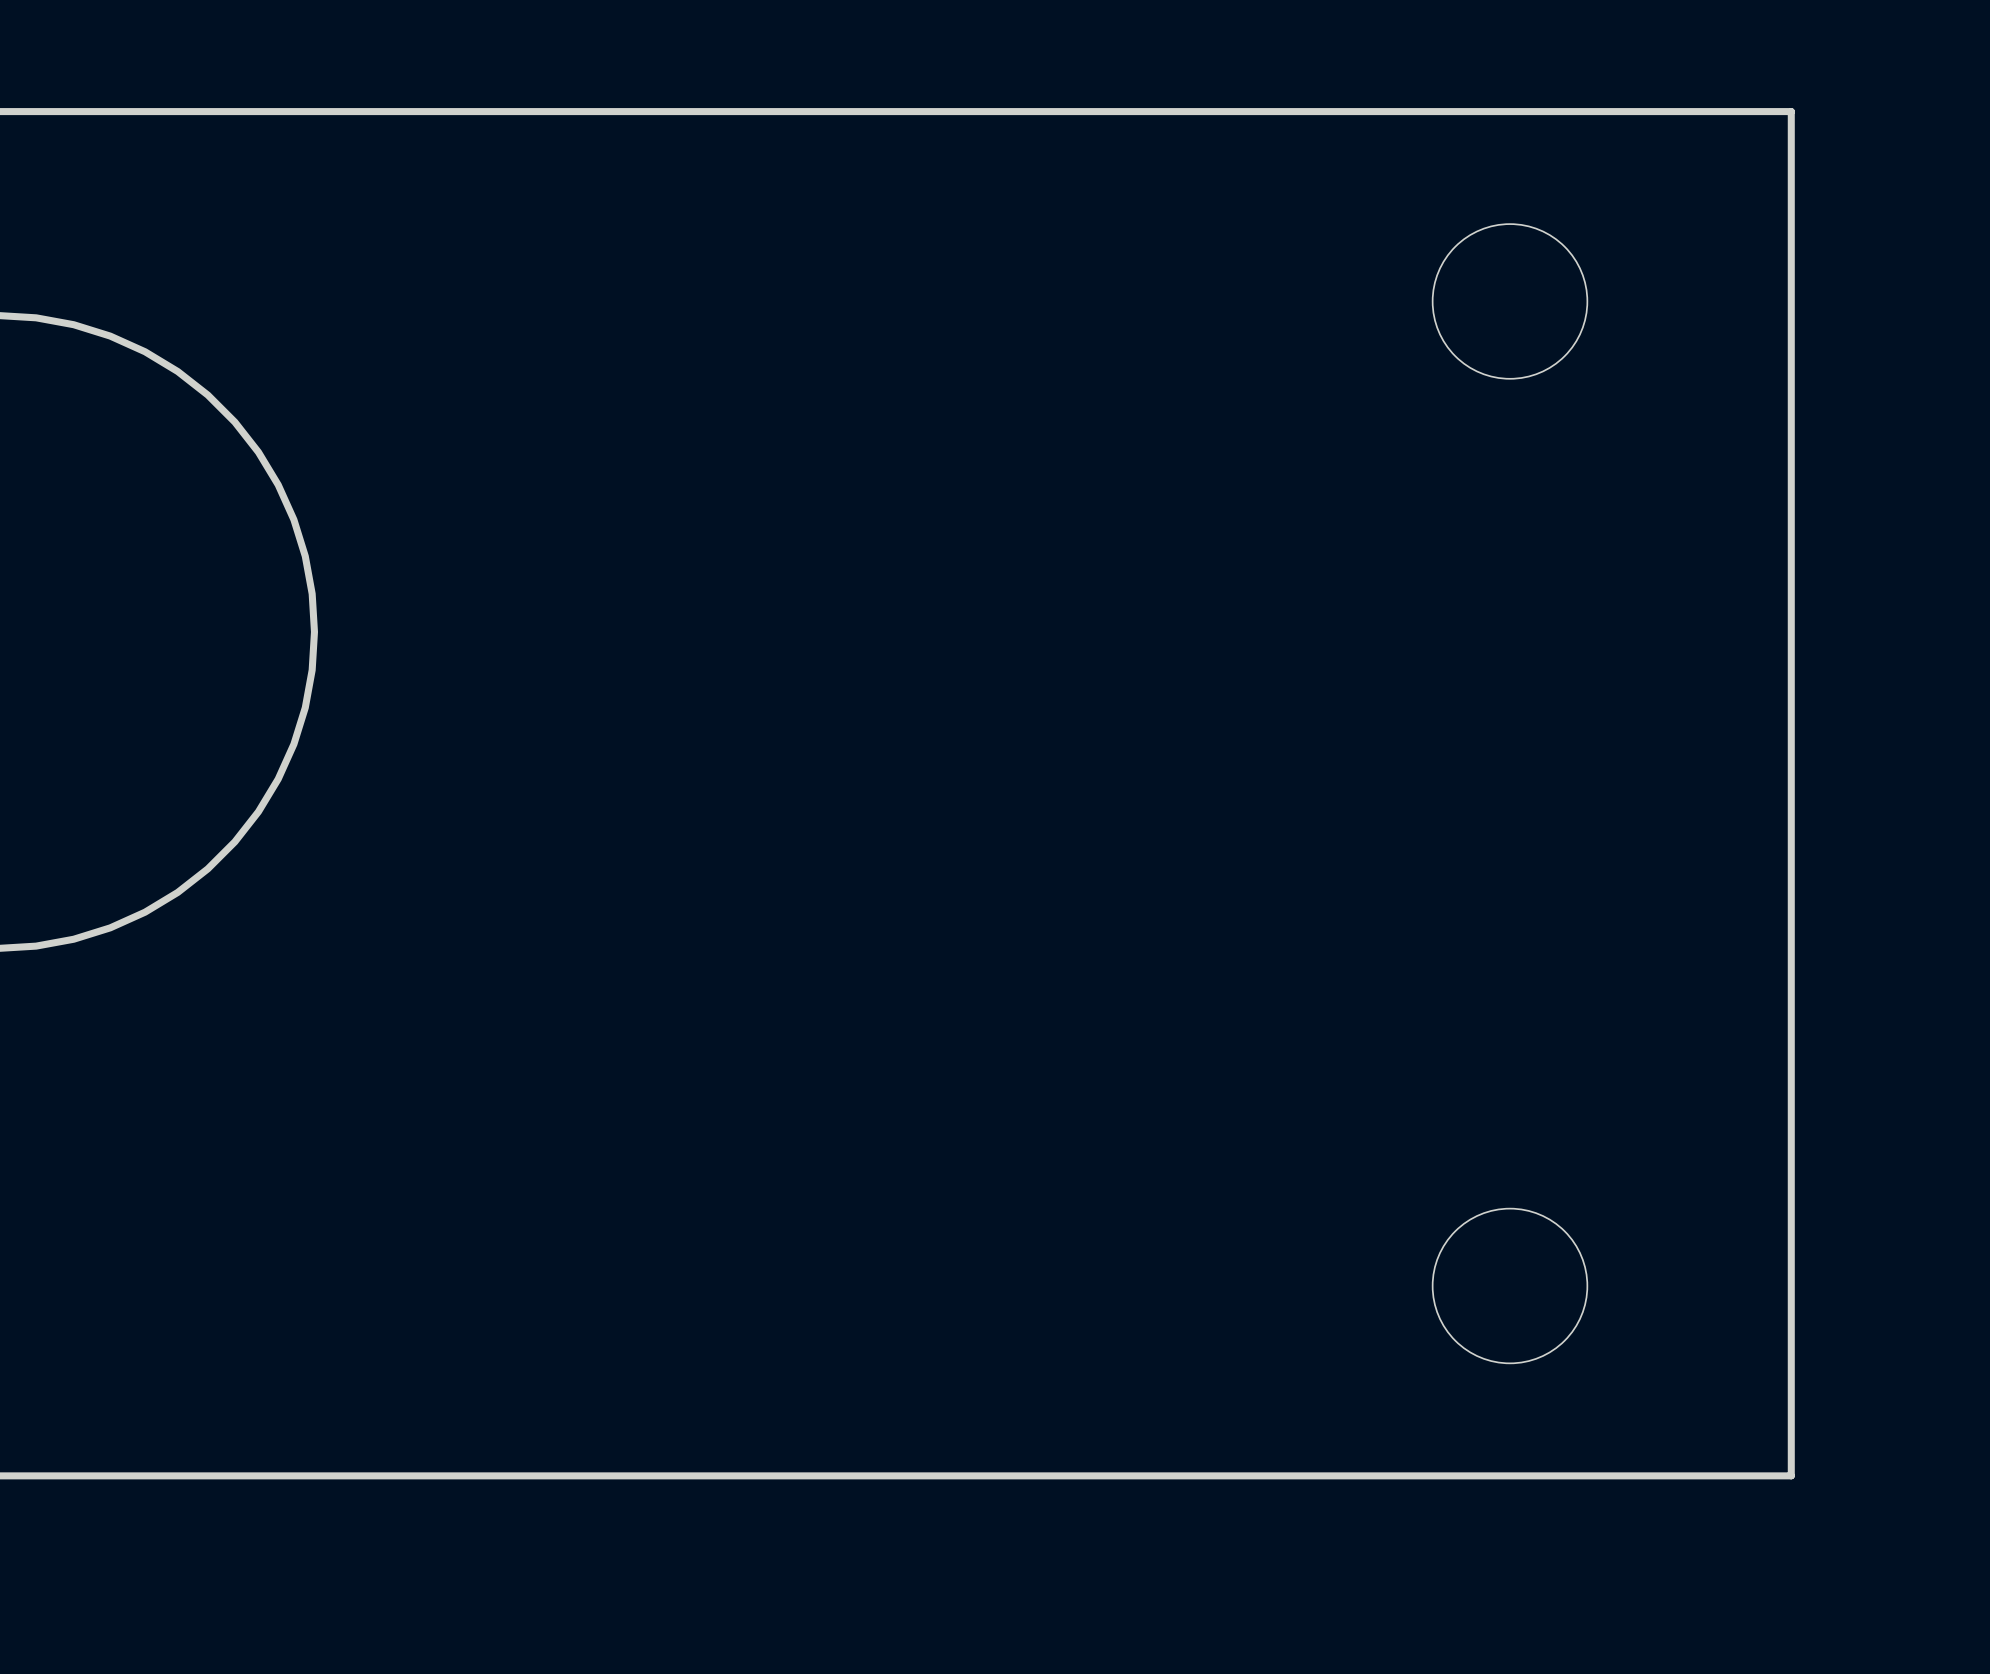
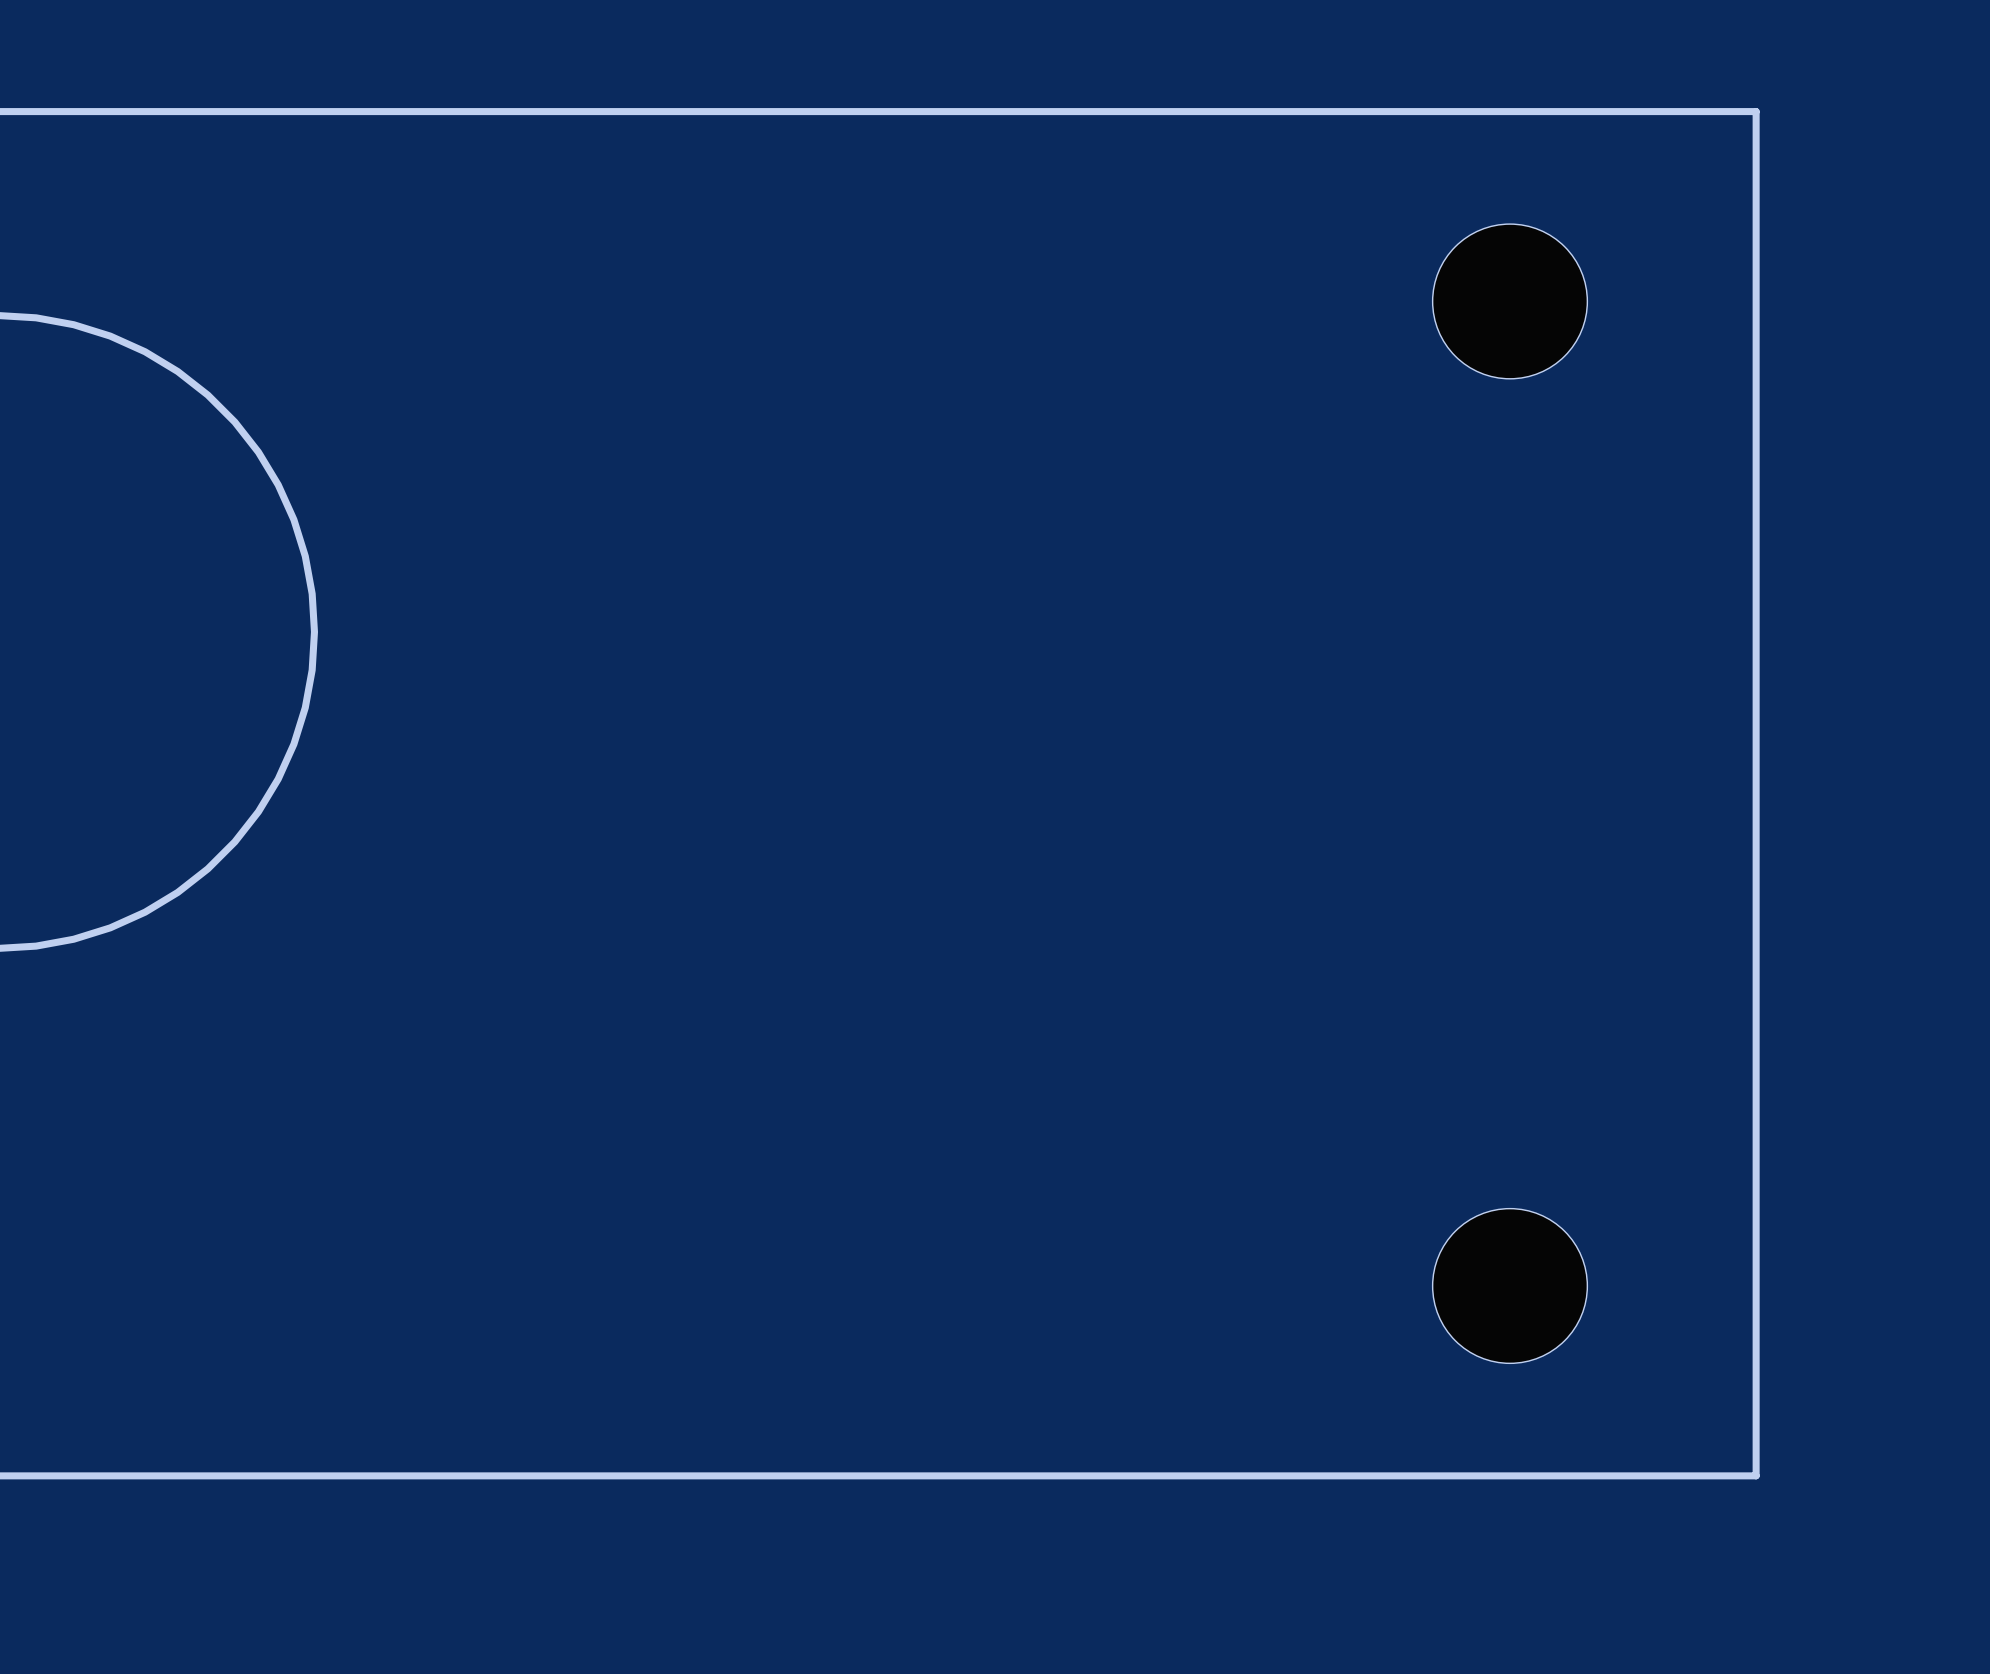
board edge: (1756, 111) (1791, 111) (1791, 1475) (1756, 1475) -> (1756, 111) (1756, 1475)

